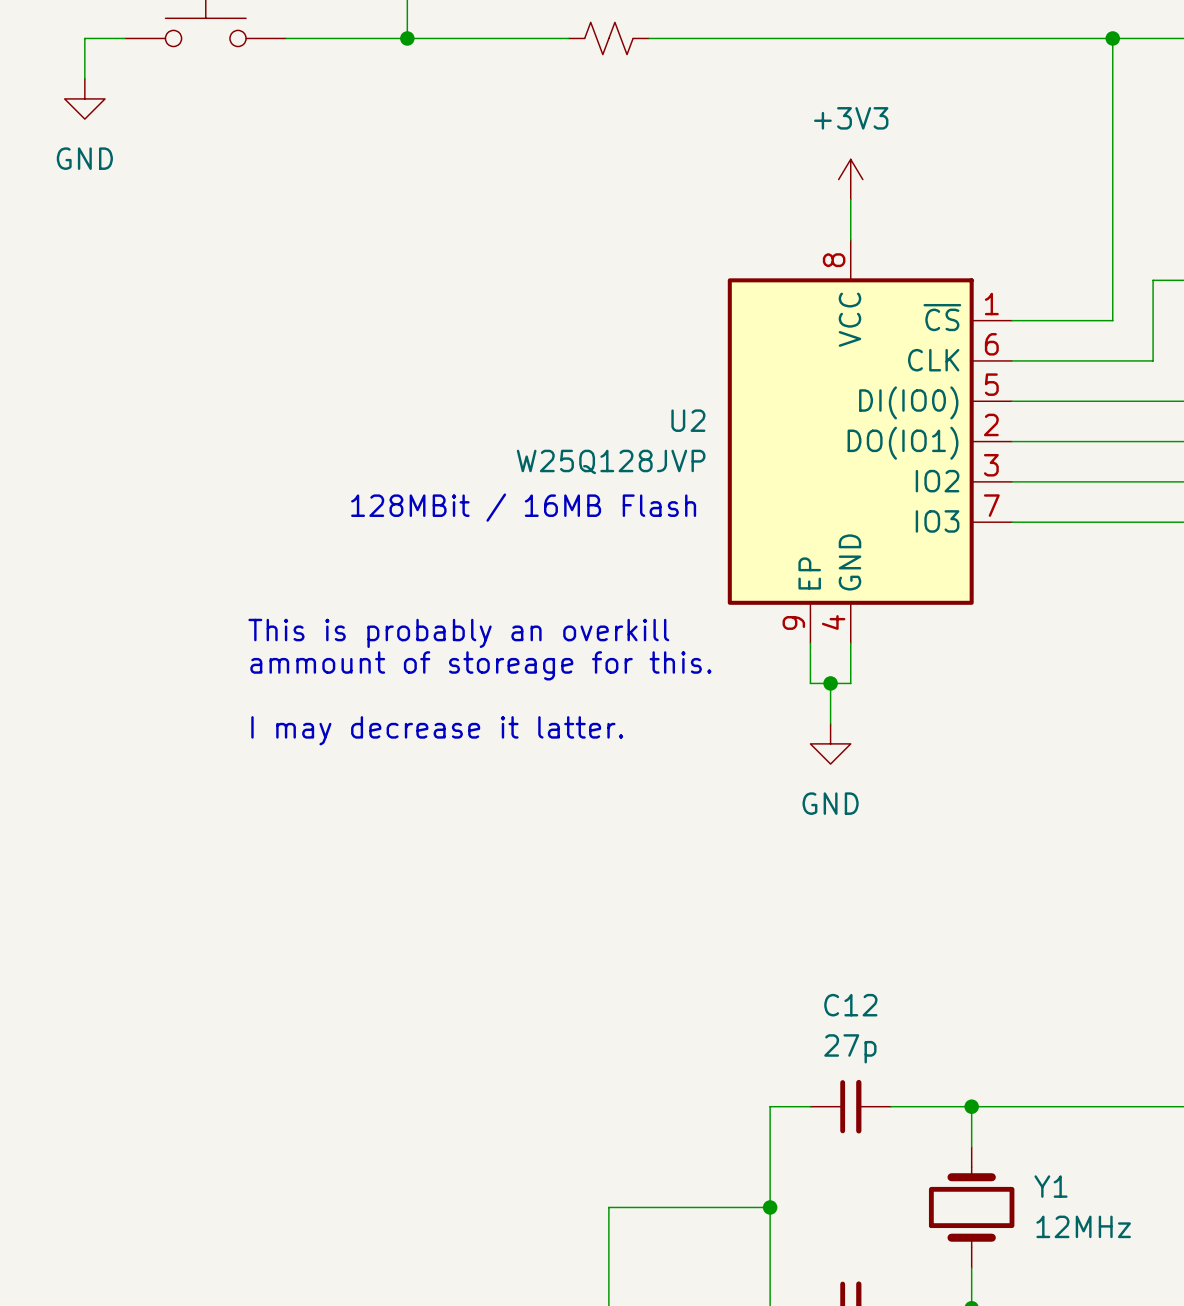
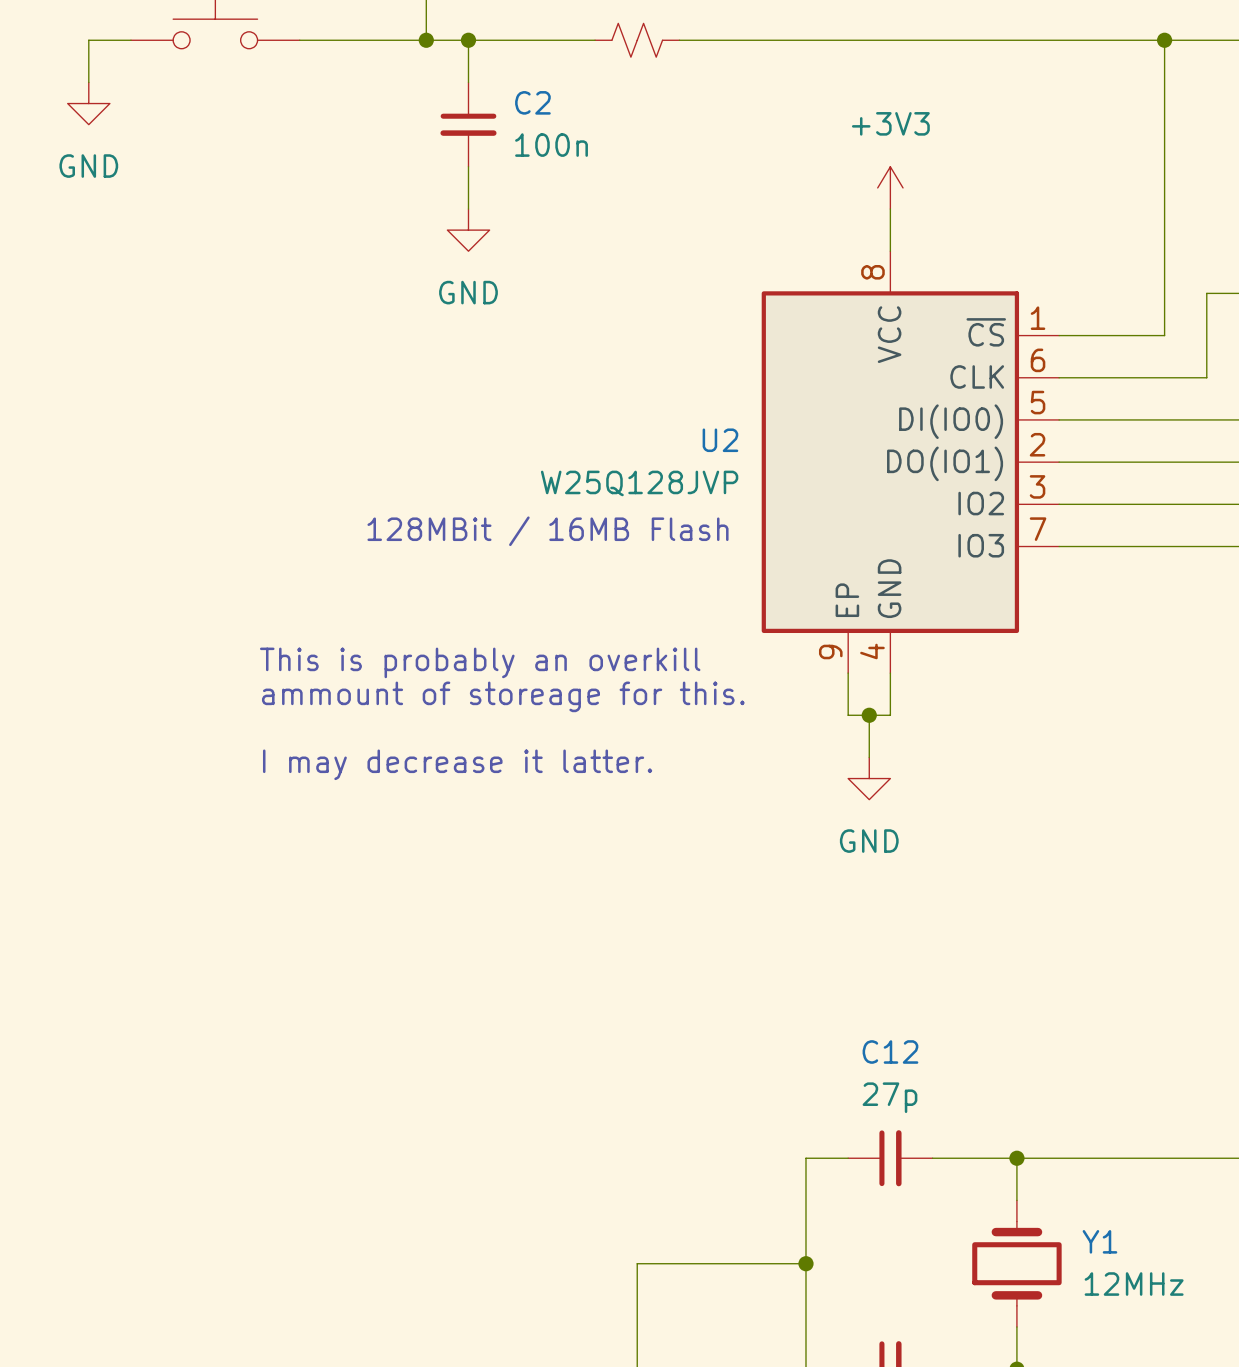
wire: none -> (468, 40) (468, 82)
junction: none -> (468, 40)
C2: none -> 100n (468, 124)
wire: none -> (468, 166) (468, 209)
power symbol: none -> GND (468, 230)

